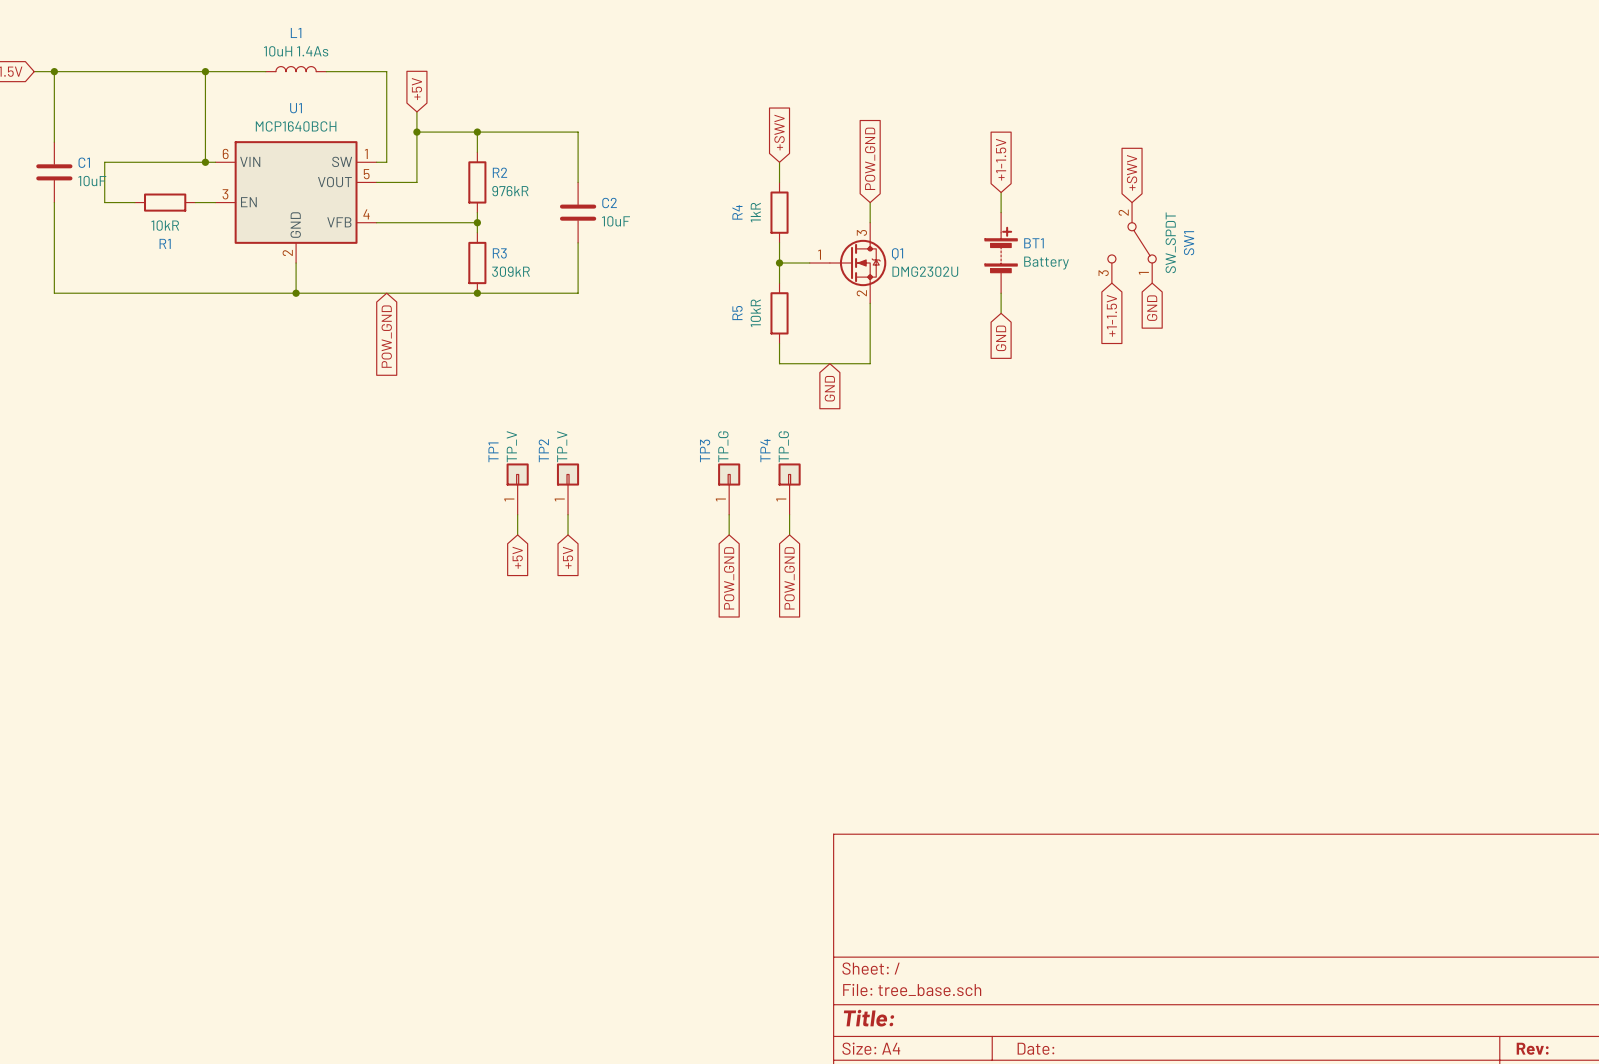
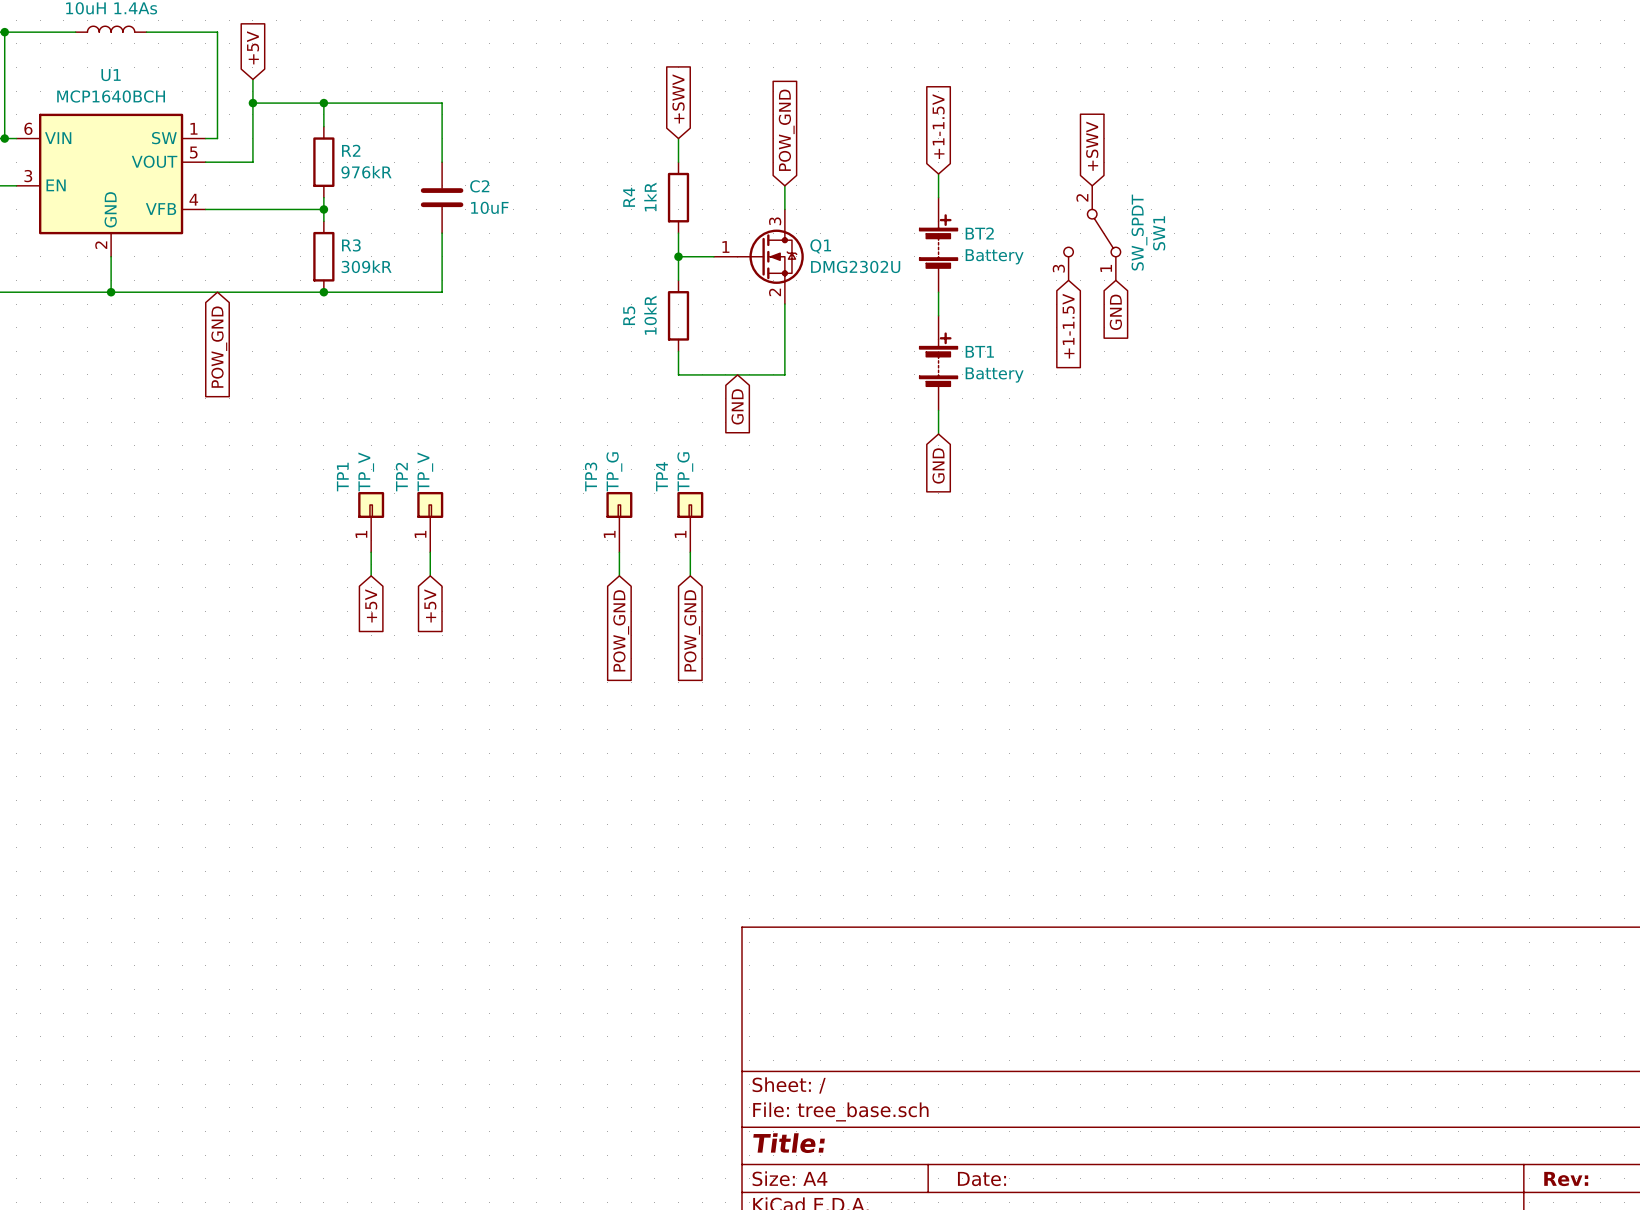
BT1 name: BT1 (1033, 243) -> BT2 (979, 233)
global label position: GND (1001, 338) -> GND (938, 465)
BT1: none -> Battery (938, 363)
wire: none -> (938, 410) (938, 434)

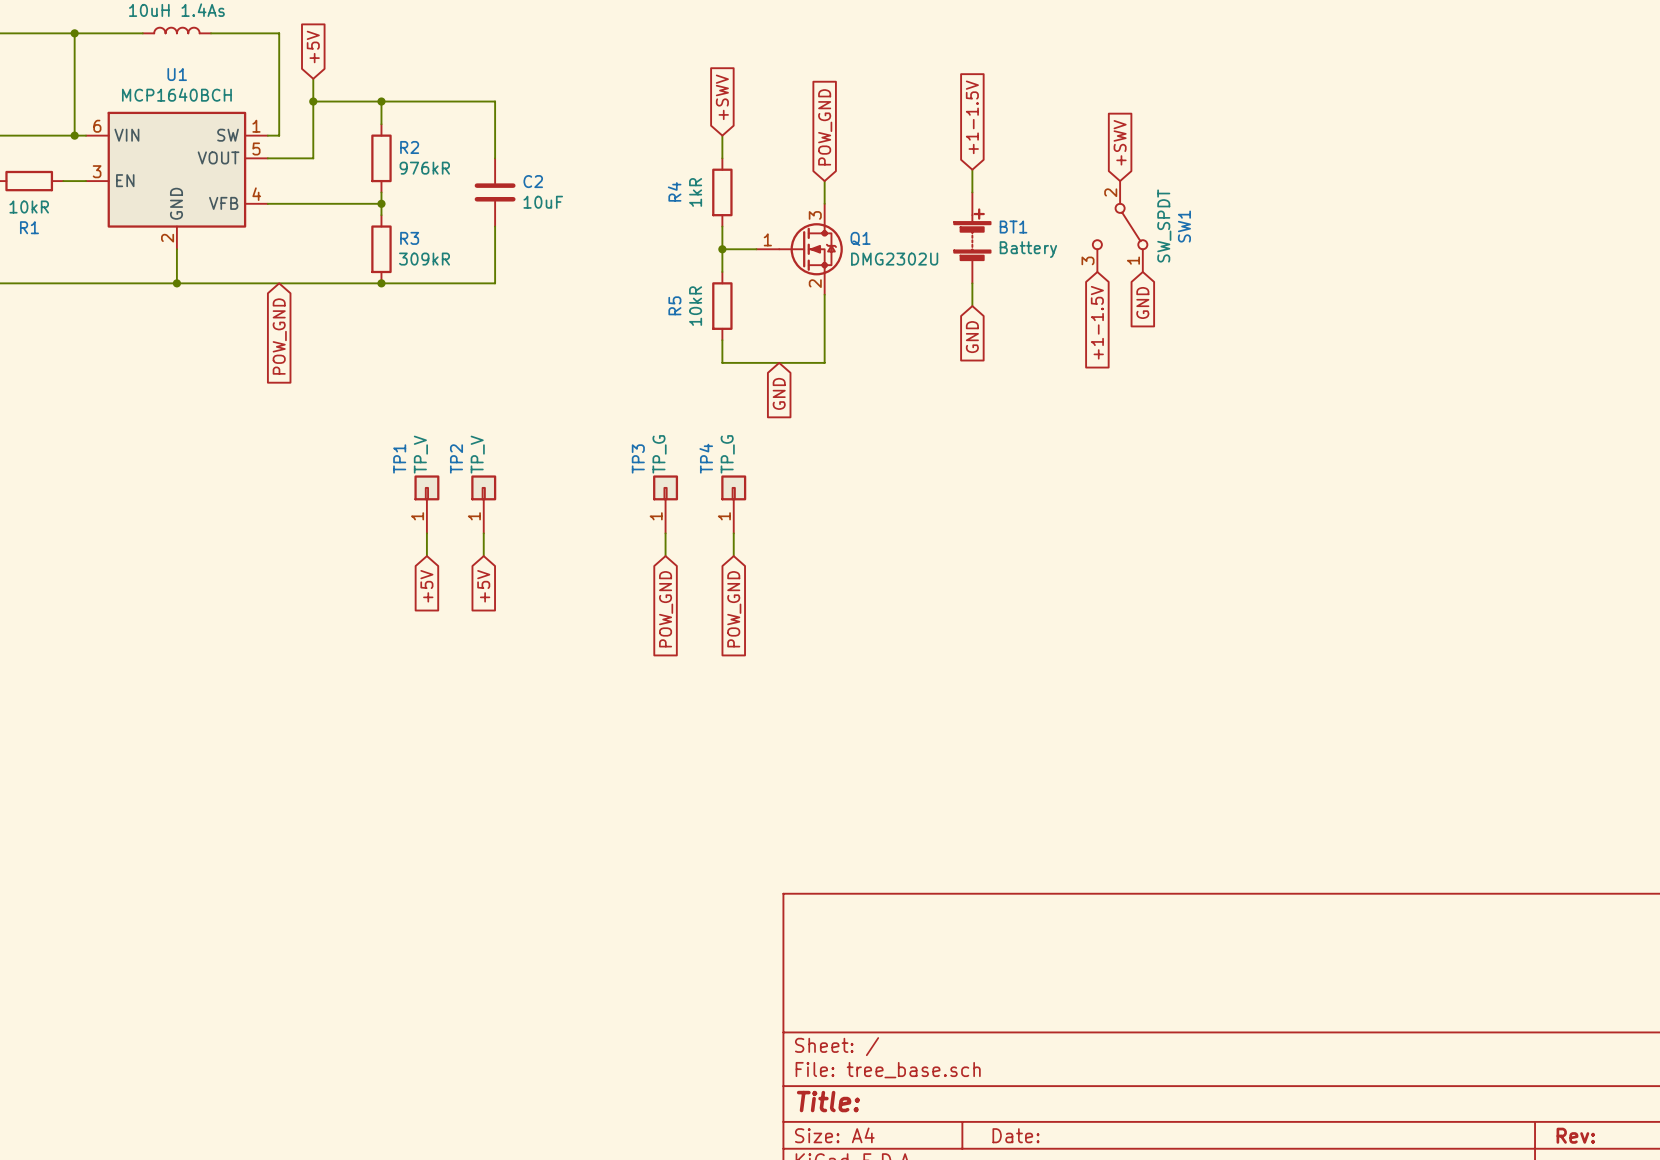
BT2 name: BT2 (979, 233) -> BT1 (1013, 227)
BT1: Battery (938, 363) -> none
wire: (938, 410) (938, 434) -> none
global label position: GND (938, 465) -> GND (972, 337)

